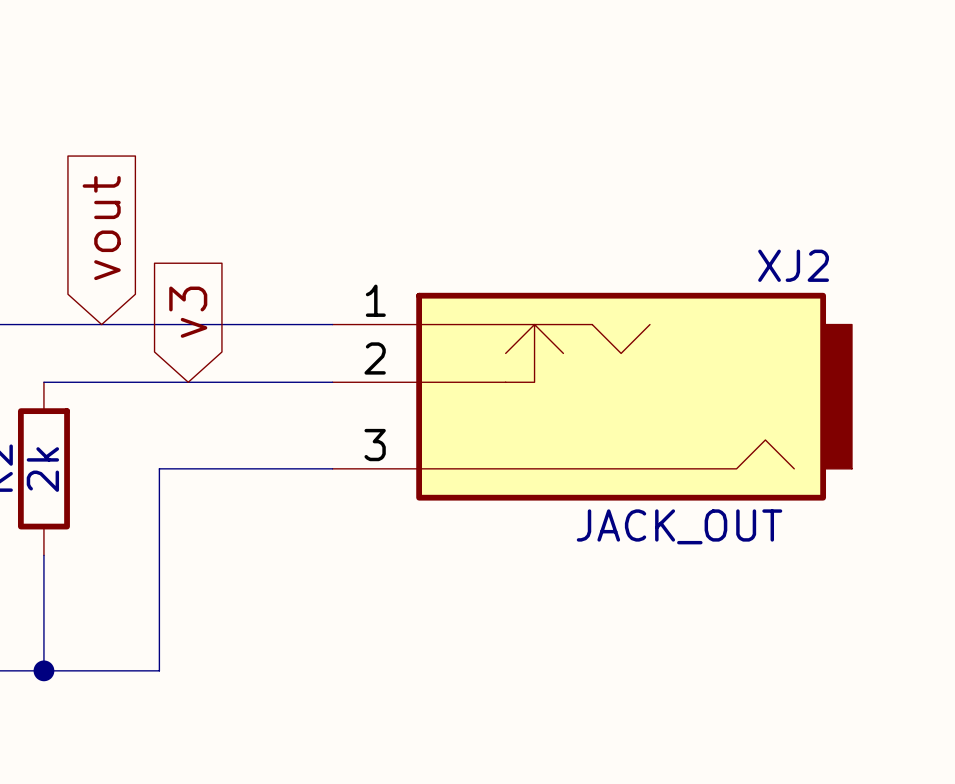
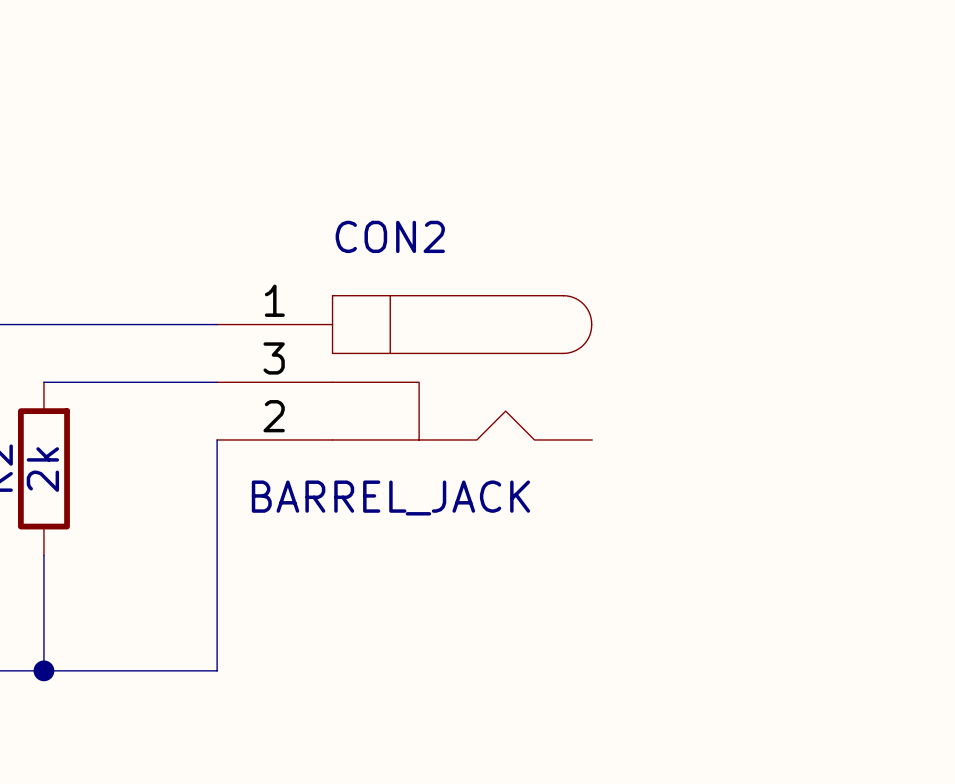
global label: vout (101, 228) -> none
global label: v3 (188, 312) -> none
CON2: none -> BARREL_JACK (404, 367)
XJ2: JACK_OUT (592, 396) -> none
wire: (332, 468) (159, 468) (159, 670) -> (217, 439) (217, 670) (159, 670)

